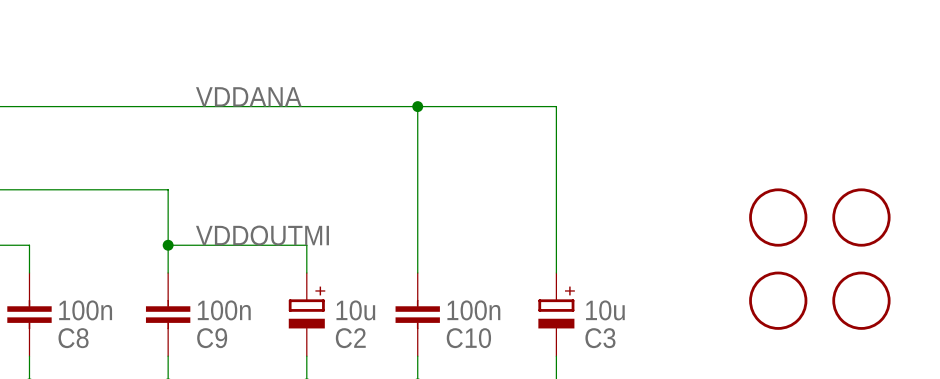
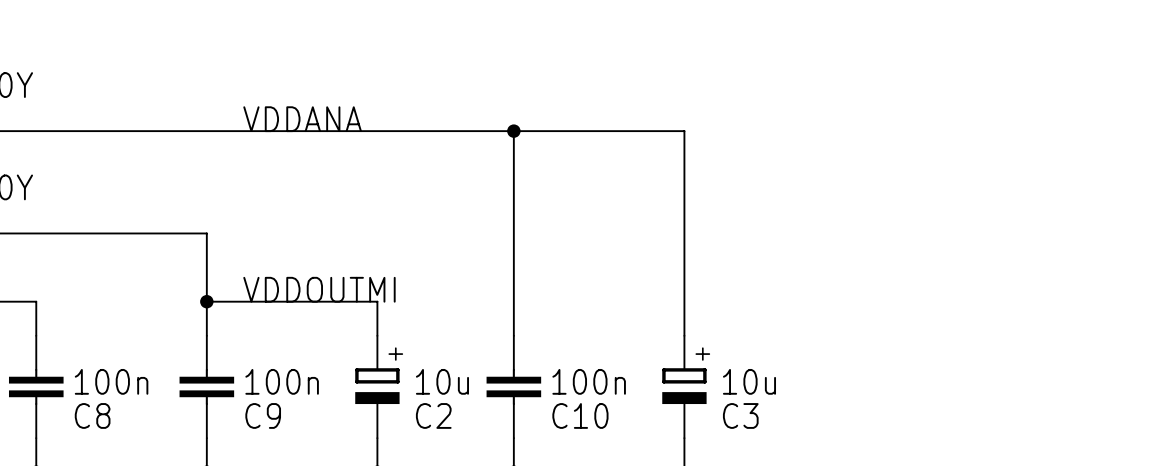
part: (778, 217) -> none
part: (861, 217) -> none
part: (778, 300) -> none
part: (861, 300) -> none

